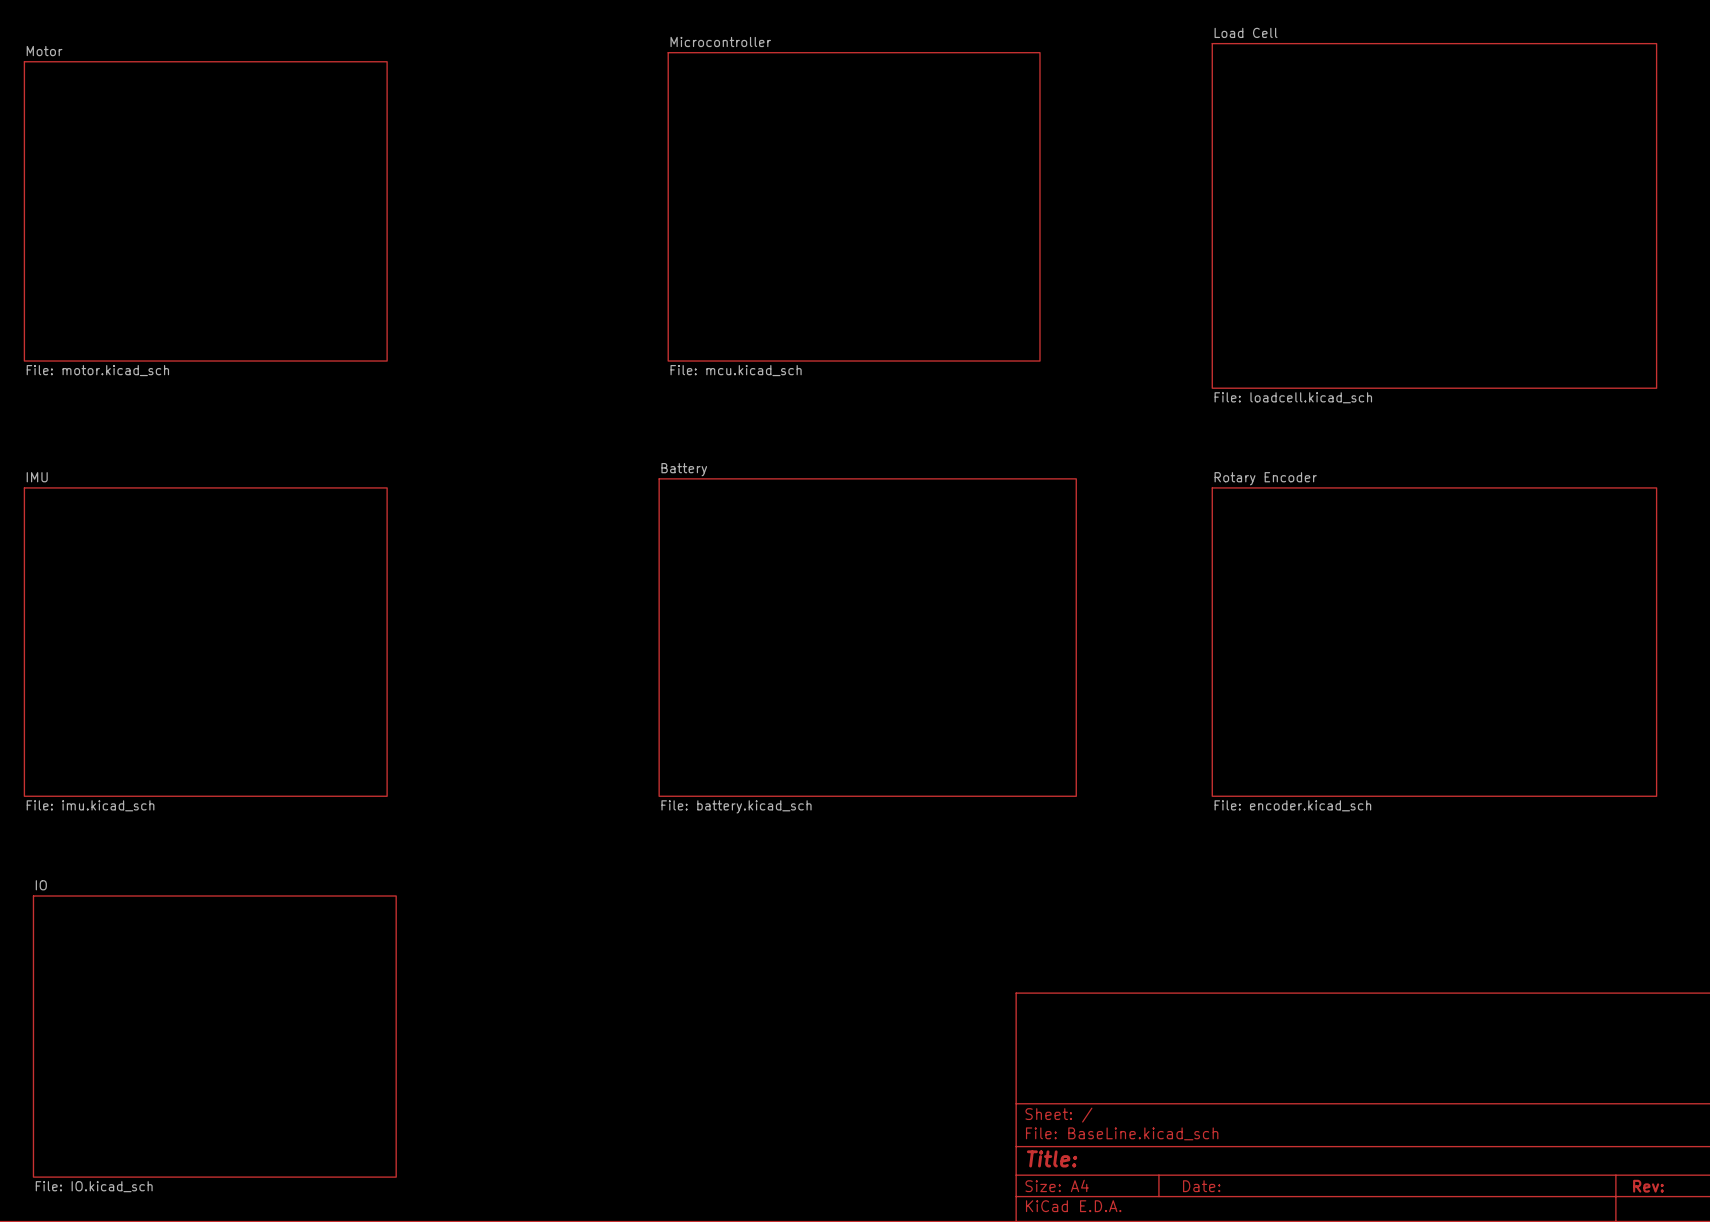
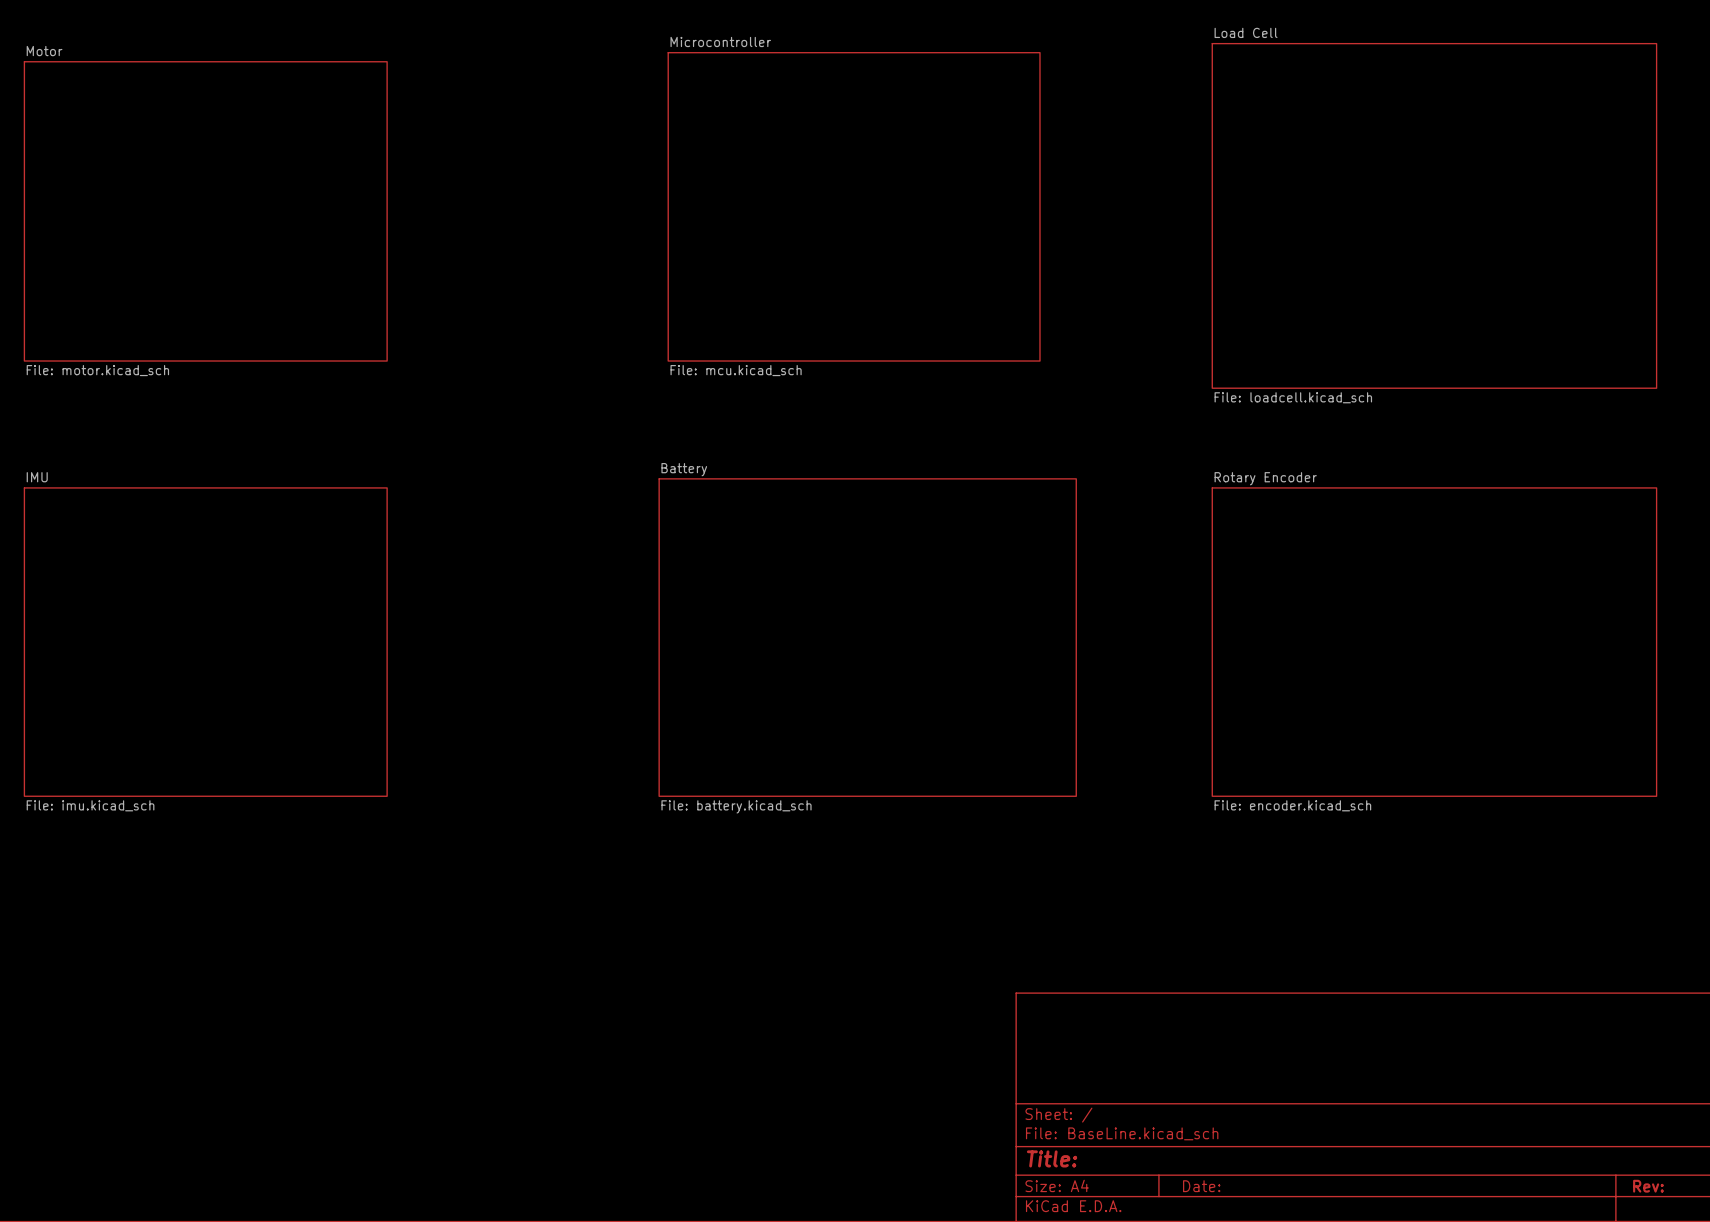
sheet IO: File: IO.kicad_sch (214, 1036) -> none

